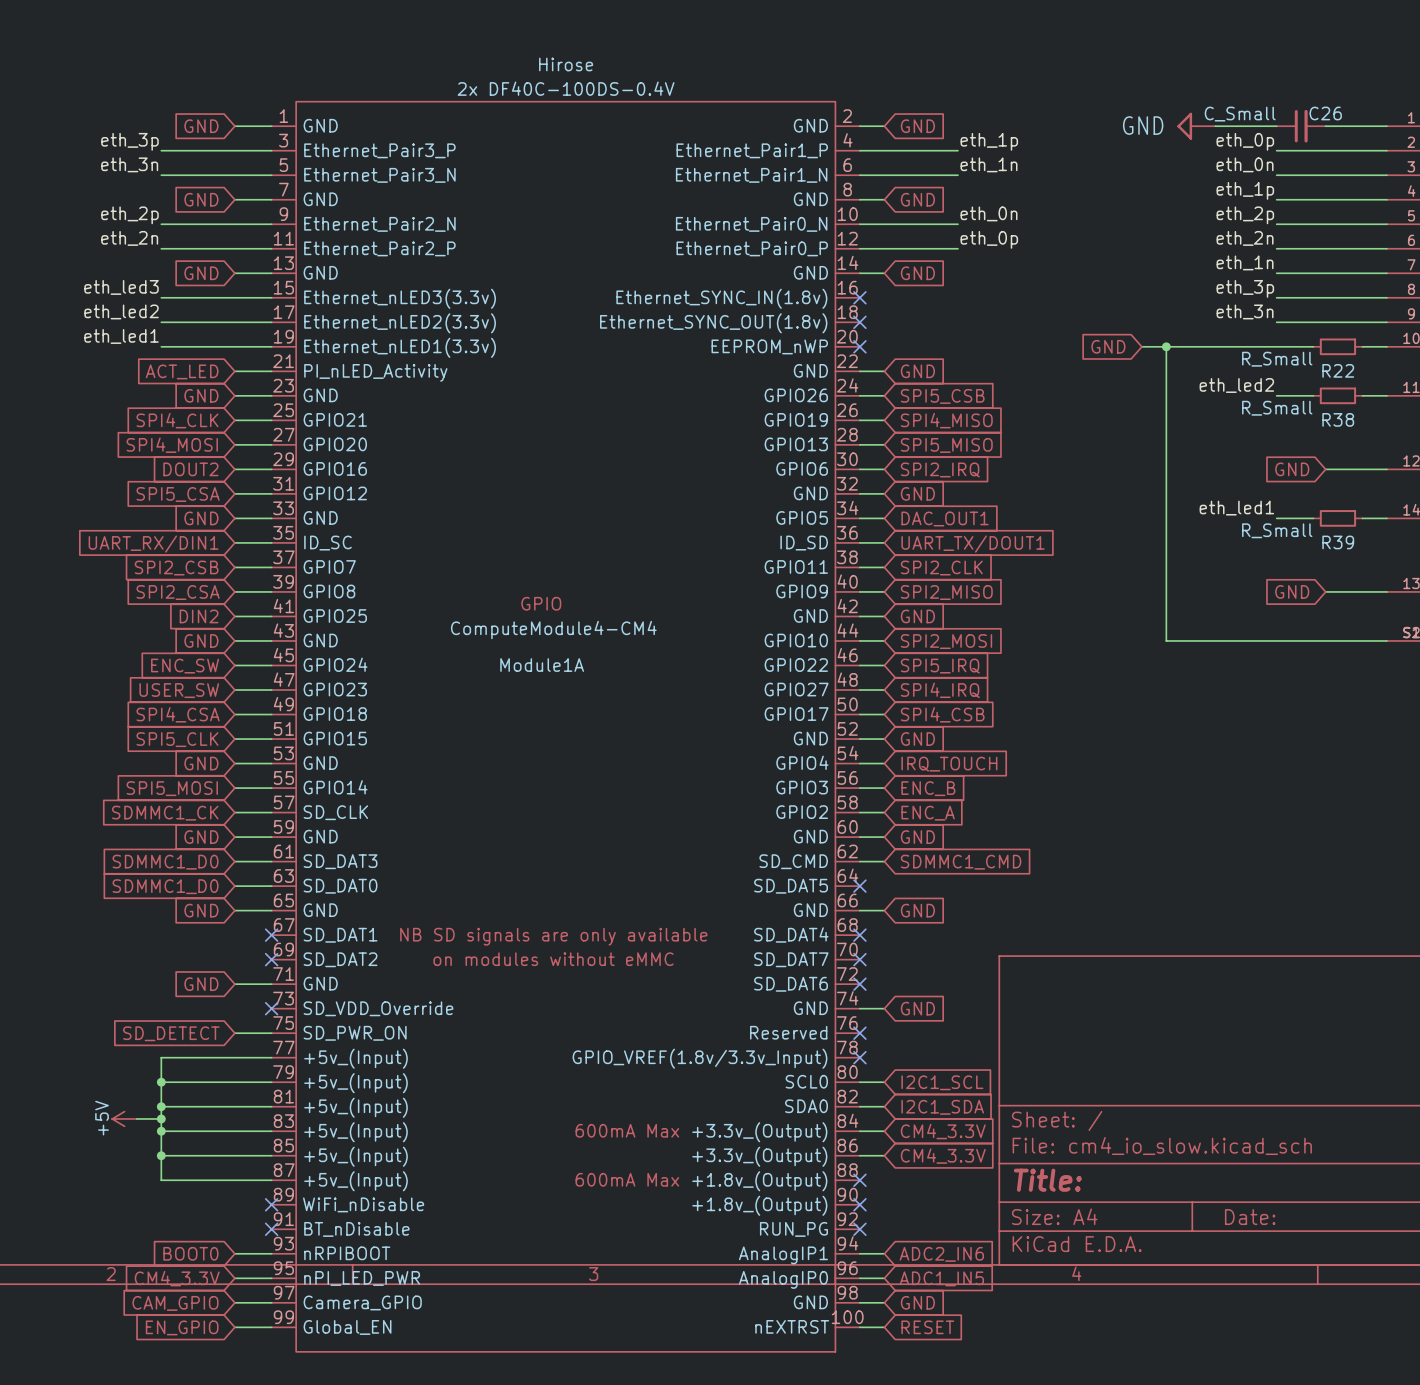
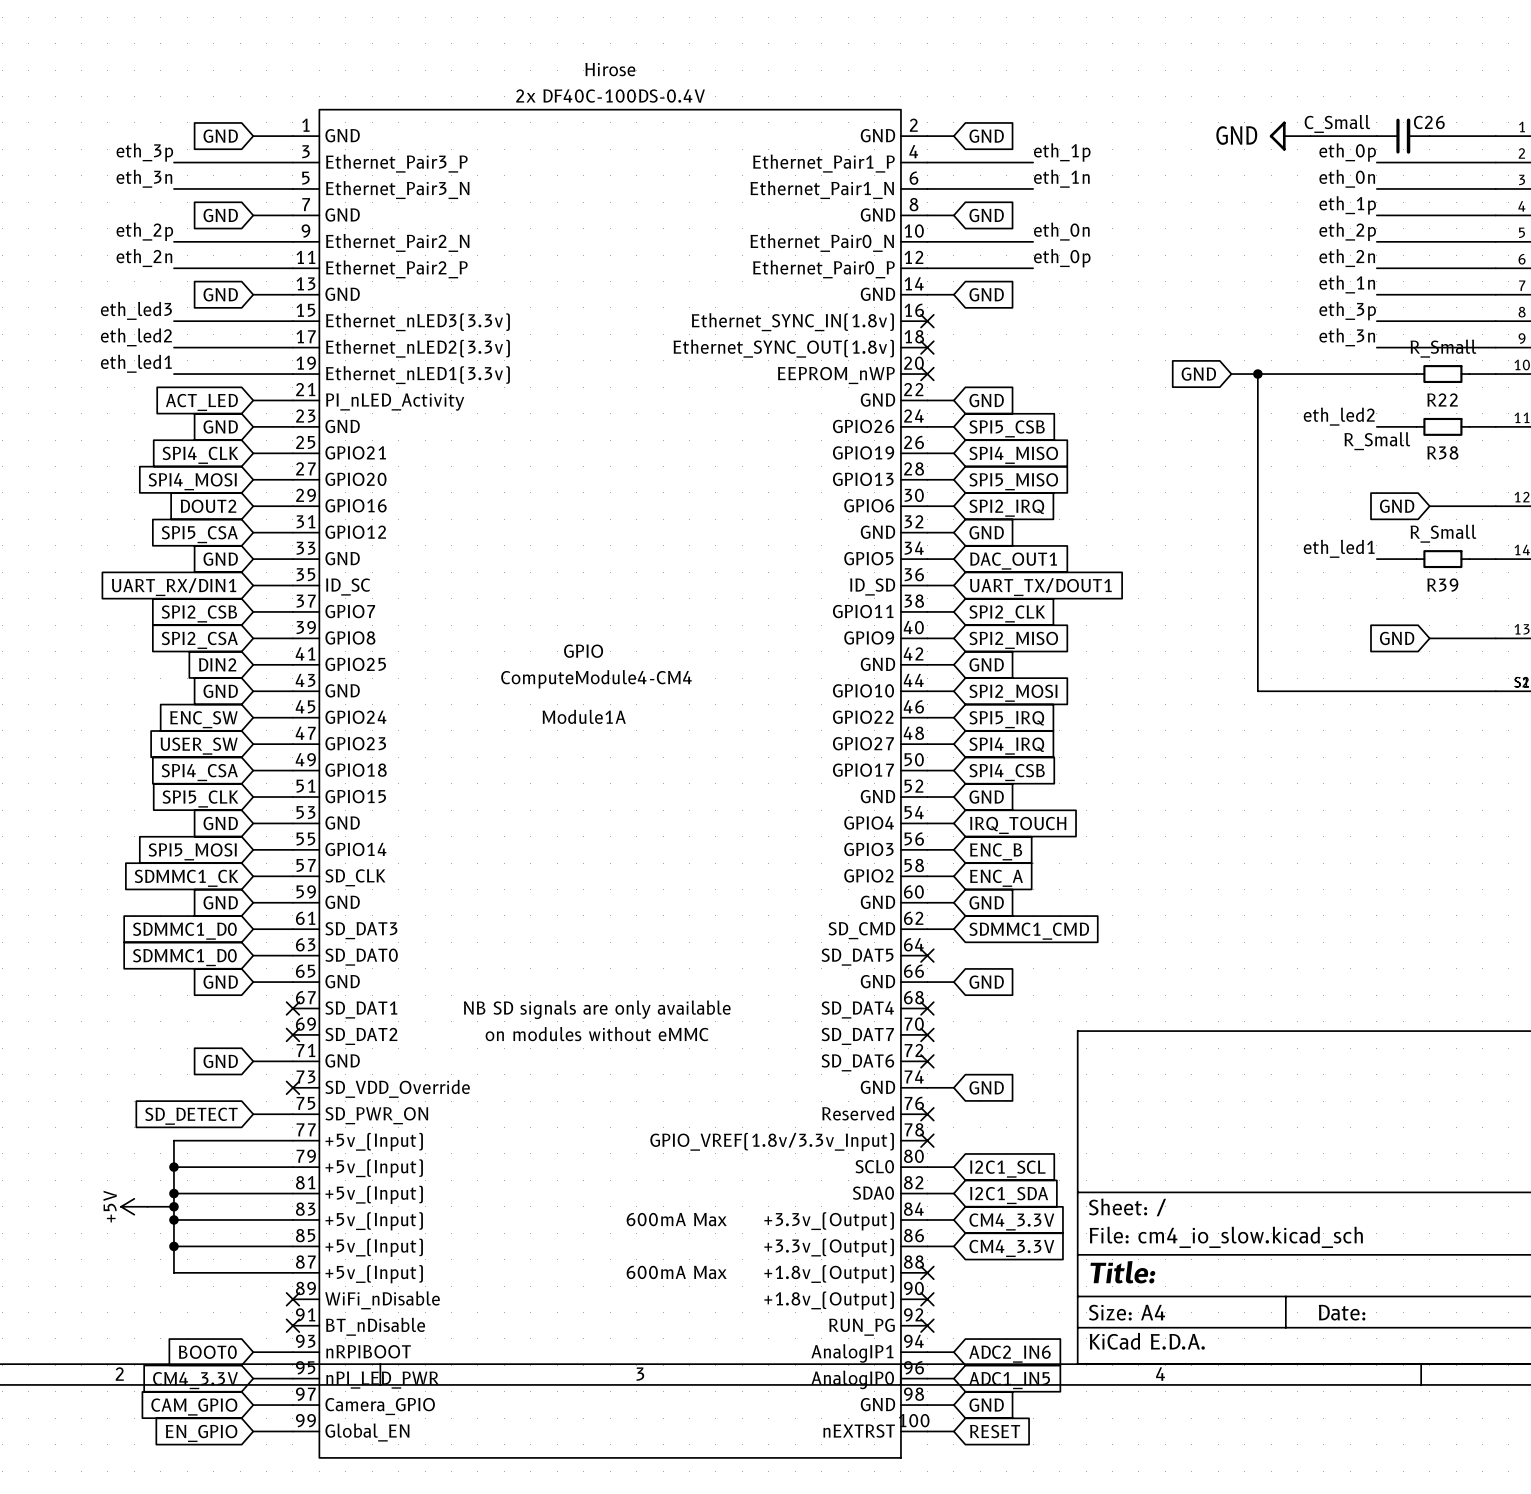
R22 value position: R_Small (1277, 359) -> R_Small (1443, 348)
R39 value position: R_Small (1277, 530) -> R_Small (1443, 533)

